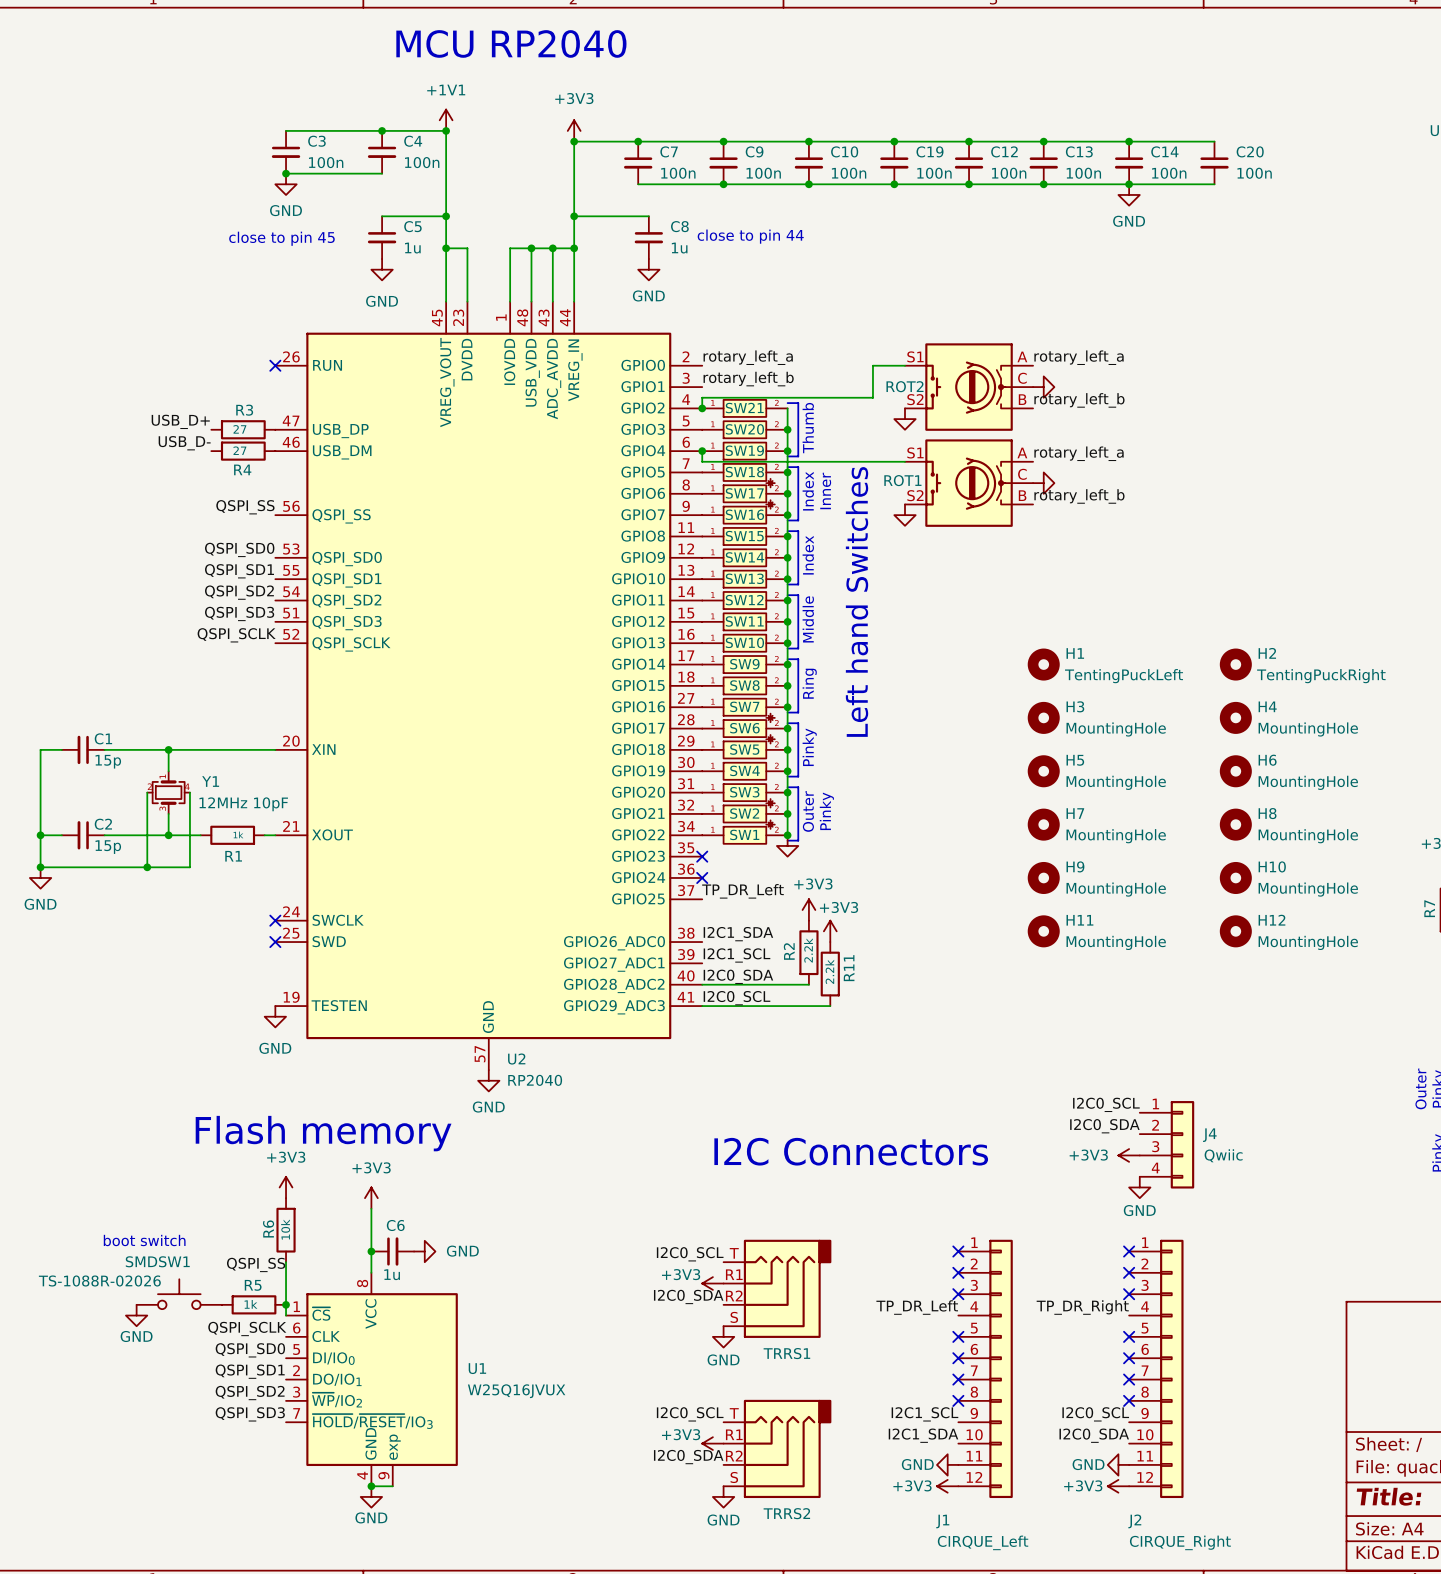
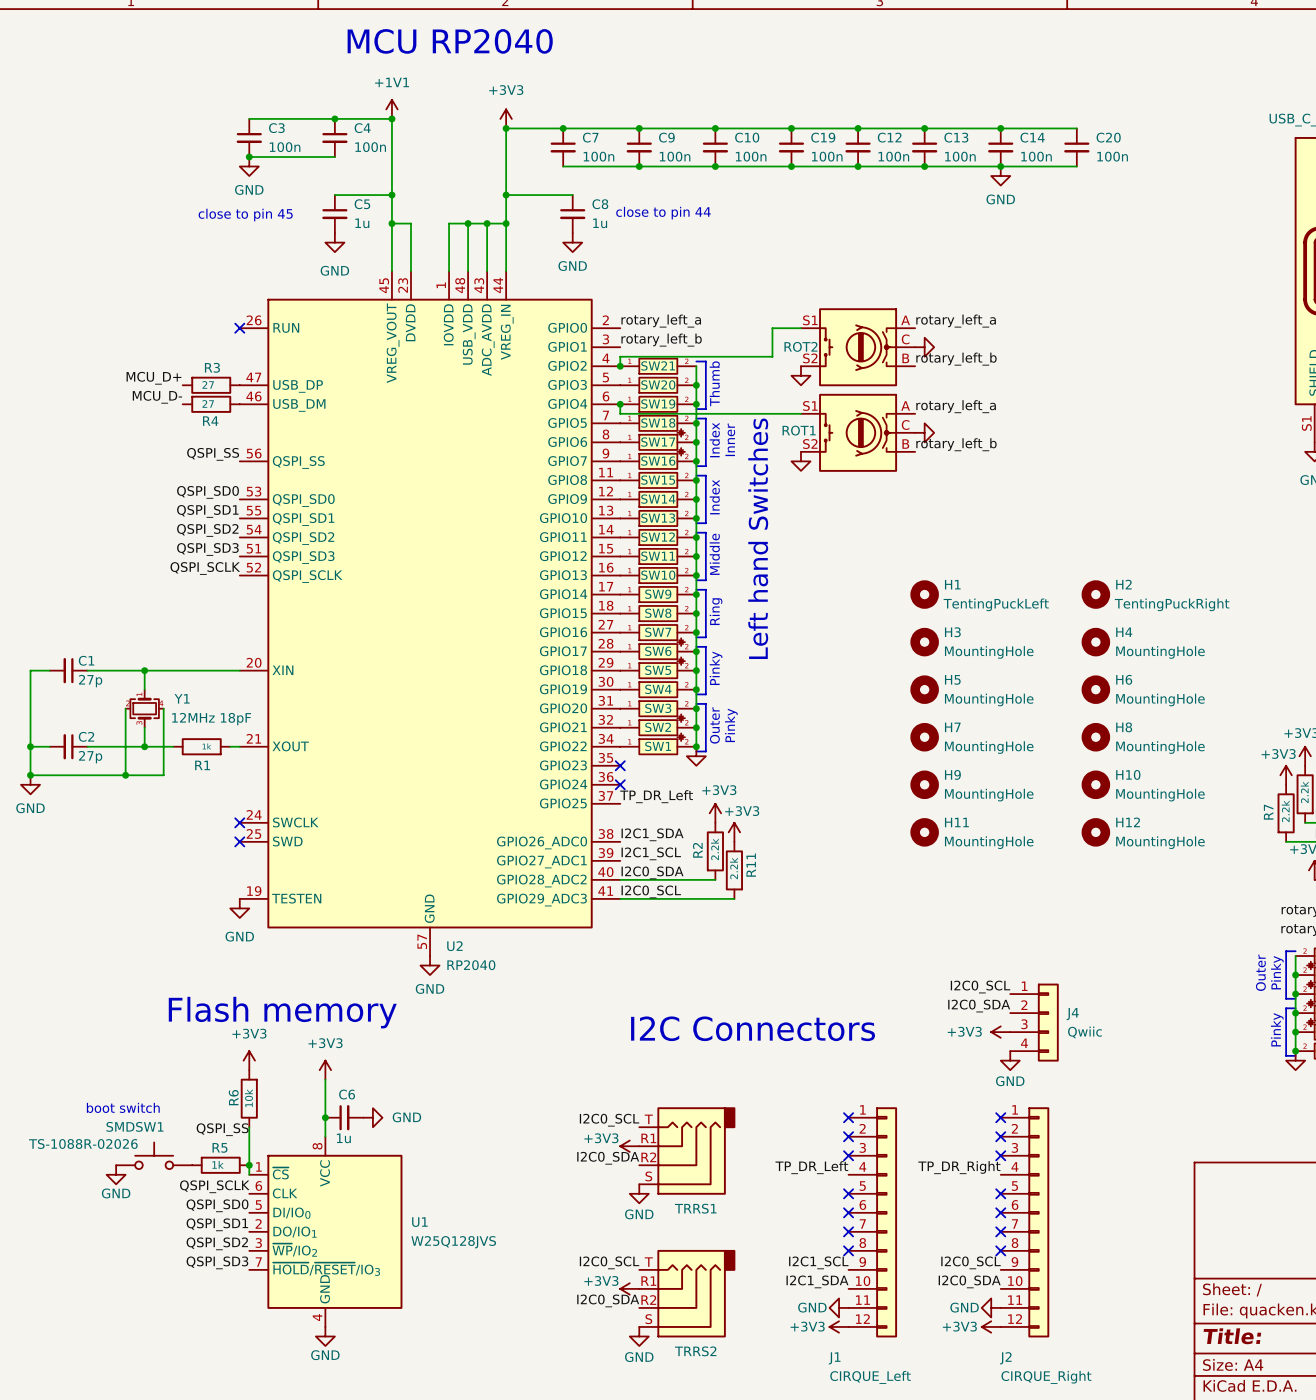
label: USB_D+ (180, 421) -> MCU_D+ (153, 378)
label: USB_D- (184, 443) -> MCU_D- (157, 397)
C1 value: 15p (108, 761) -> 27p (90, 681)
Y1 value: 12MHz 10pF (243, 804) -> 12MHz 18pF (211, 719)
C2 value: 15p (108, 847) -> 27p (90, 757)
U1 symbol: [286, 1272, 458, 1487] -> [249, 1136, 403, 1327]
U1 value: W25Q16JVUX (516, 1391) -> W25Q128JVS (453, 1242)
wire: (371, 1486) (392, 1486) -> none
junction: (371, 1486) -> none

